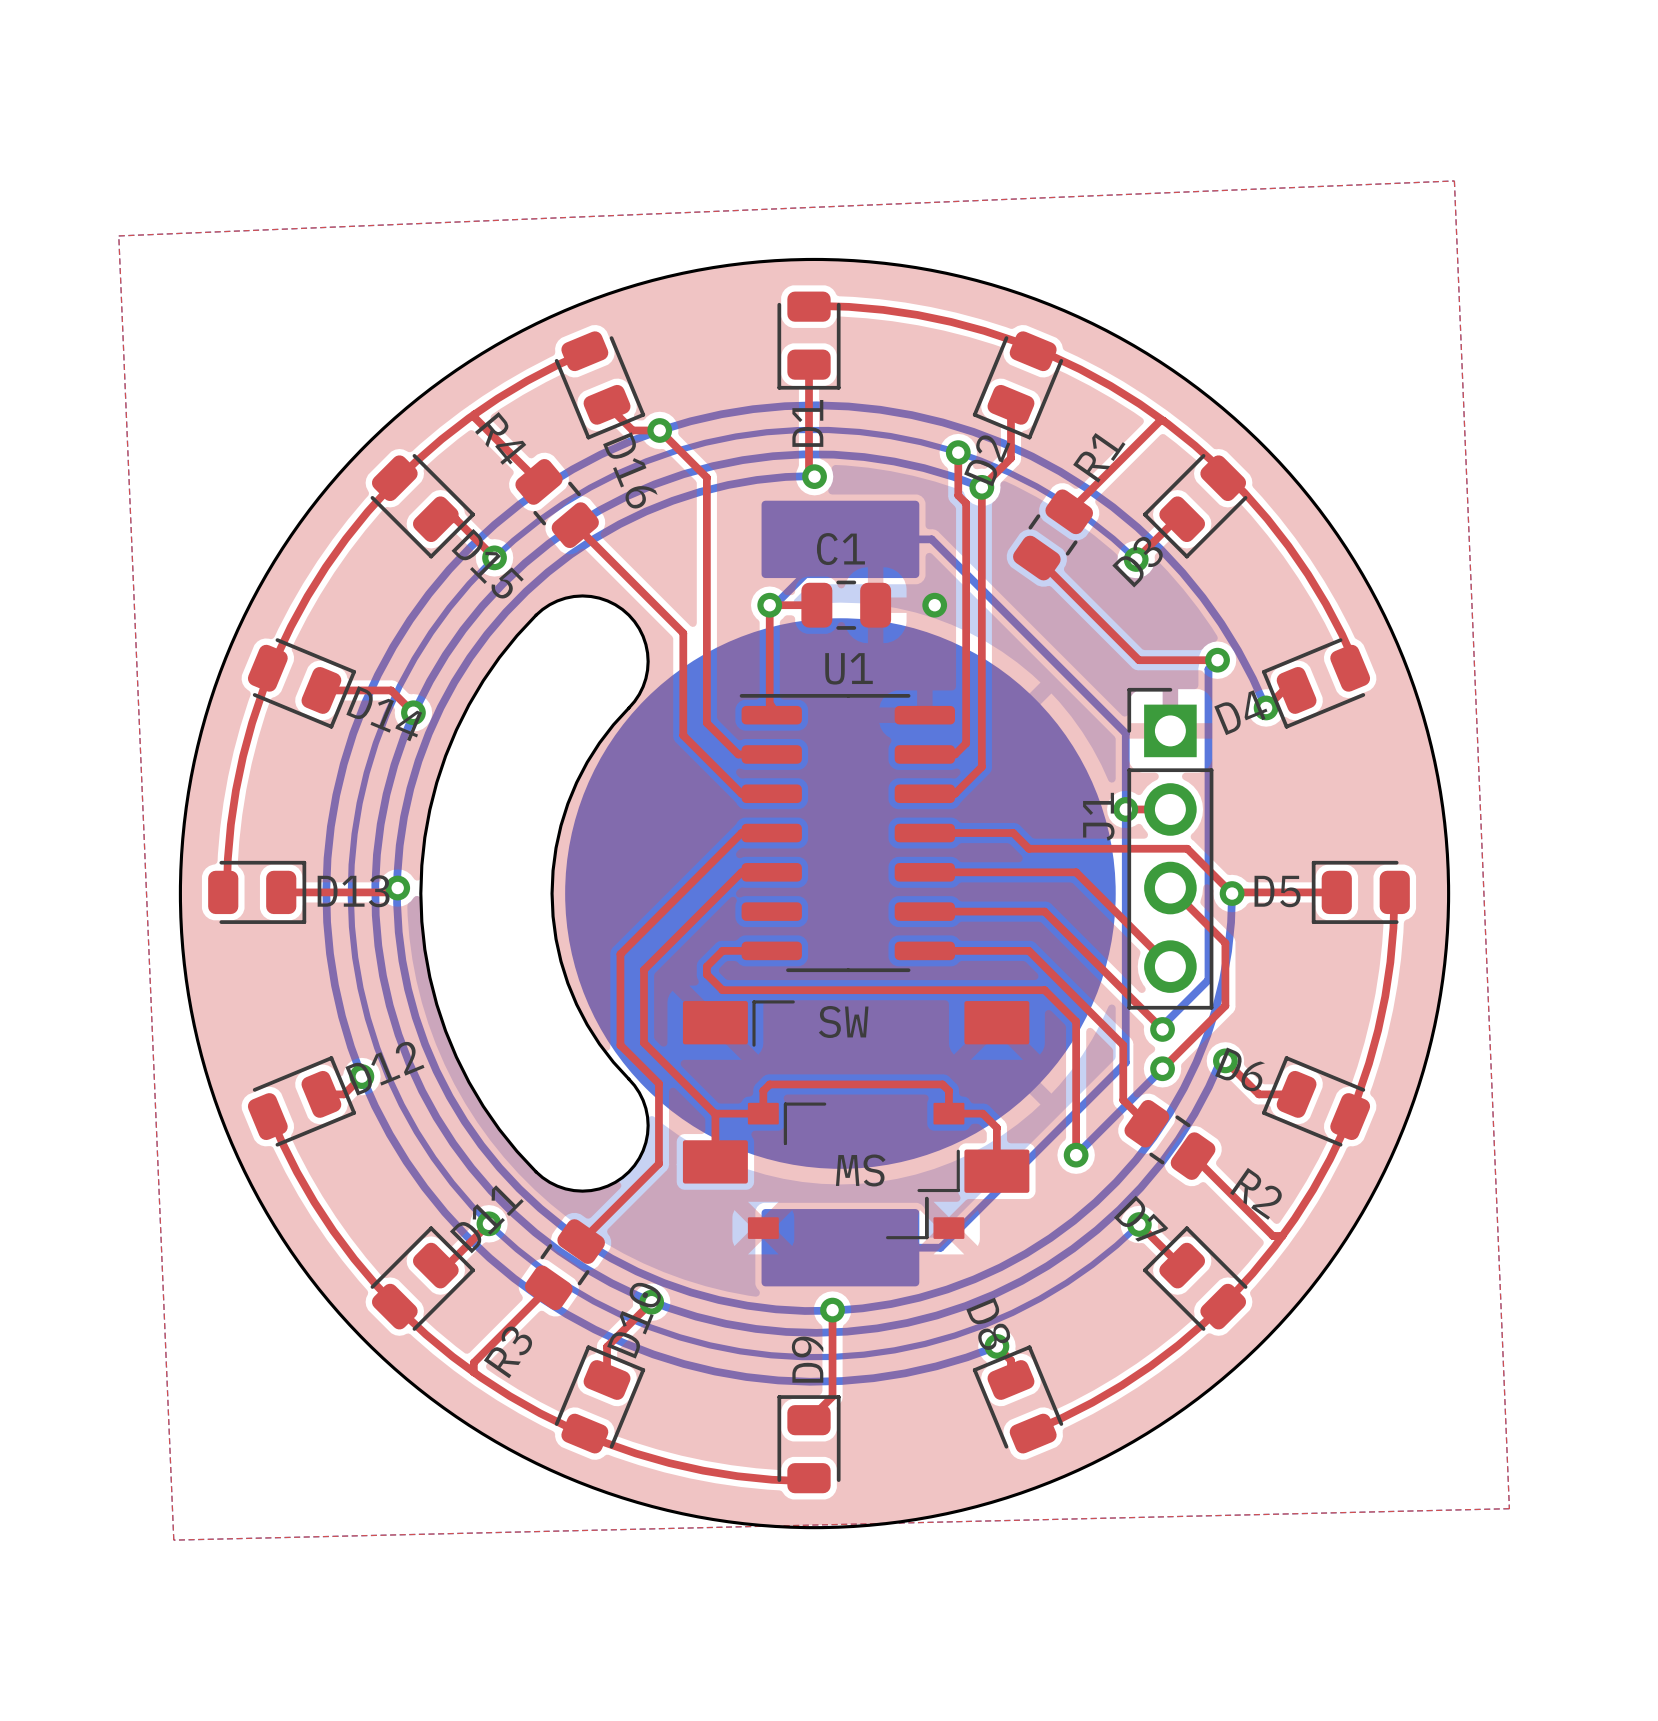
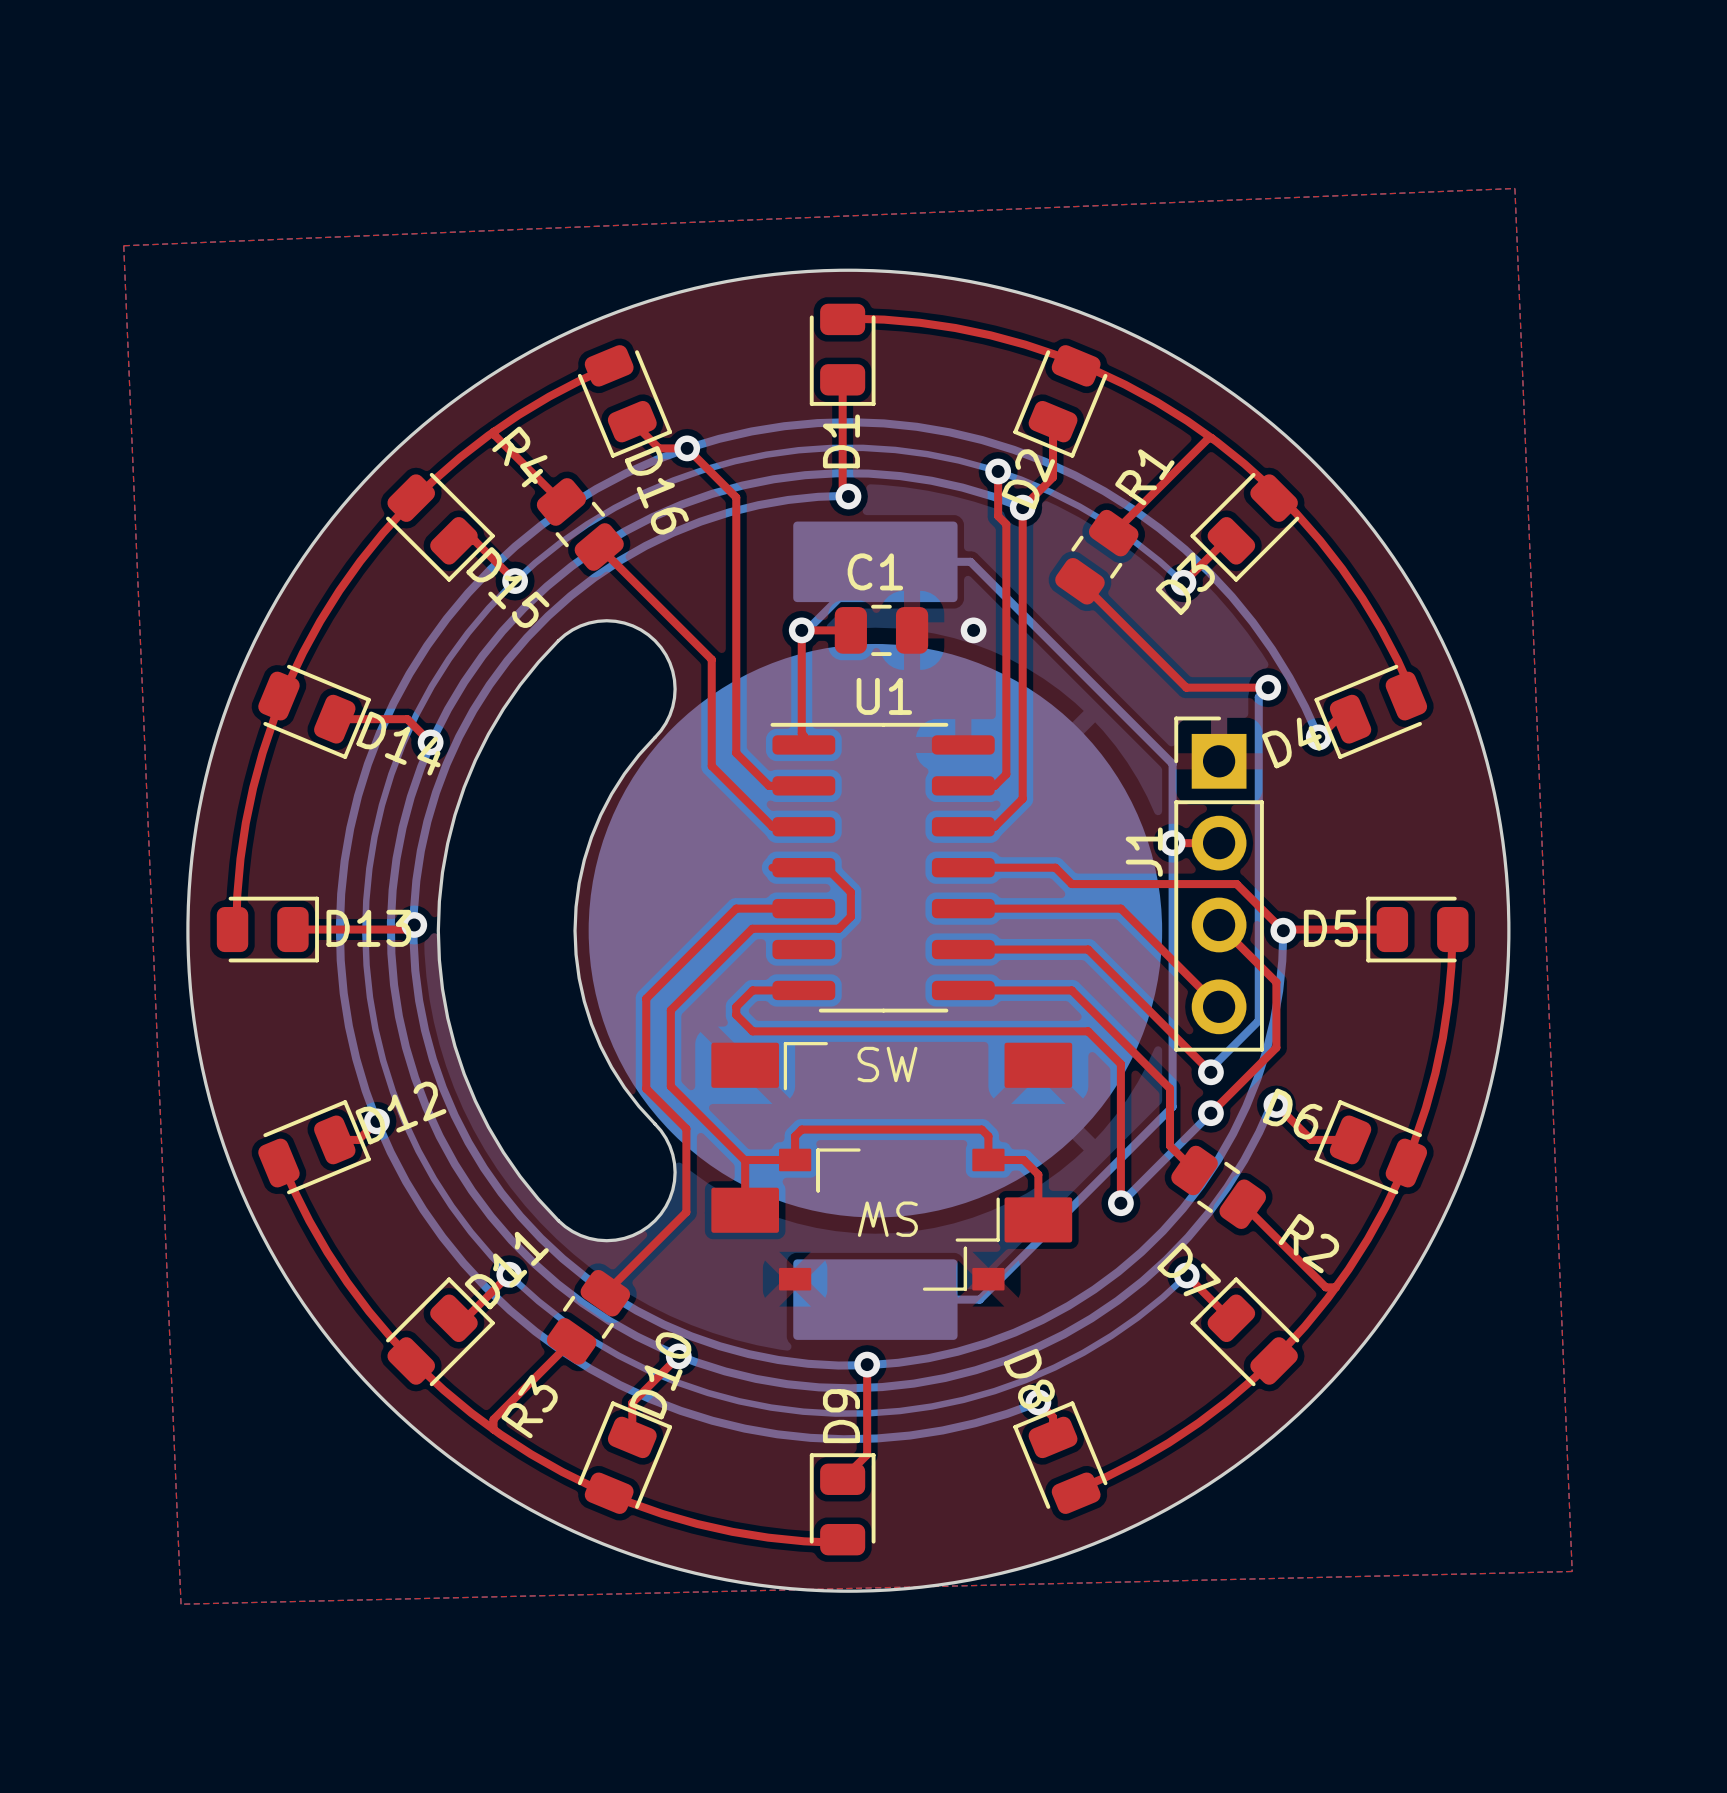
top track: (741, 833) (620, 954) (620, 958) -> (772, 908) (736, 908) (646, 998)
top track: (741, 872) (722, 891) -> (803, 867) (826, 867) (850, 892) (850, 916) (838, 928) (752, 928)

